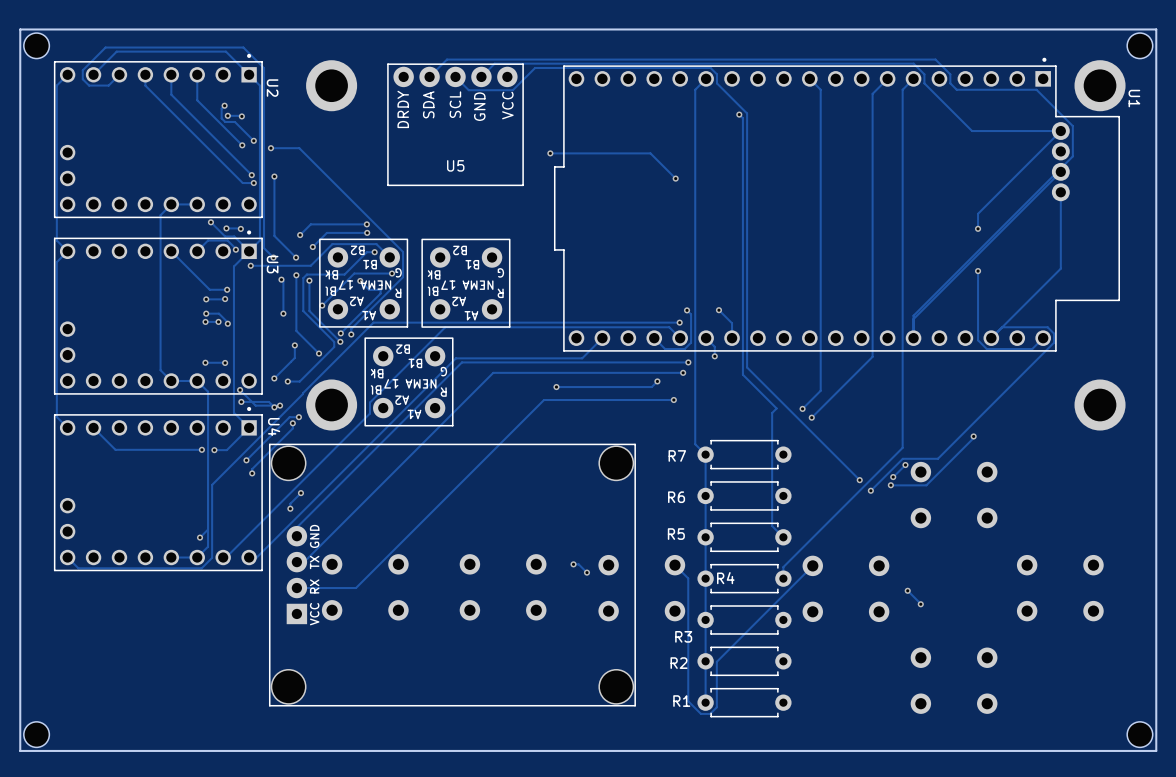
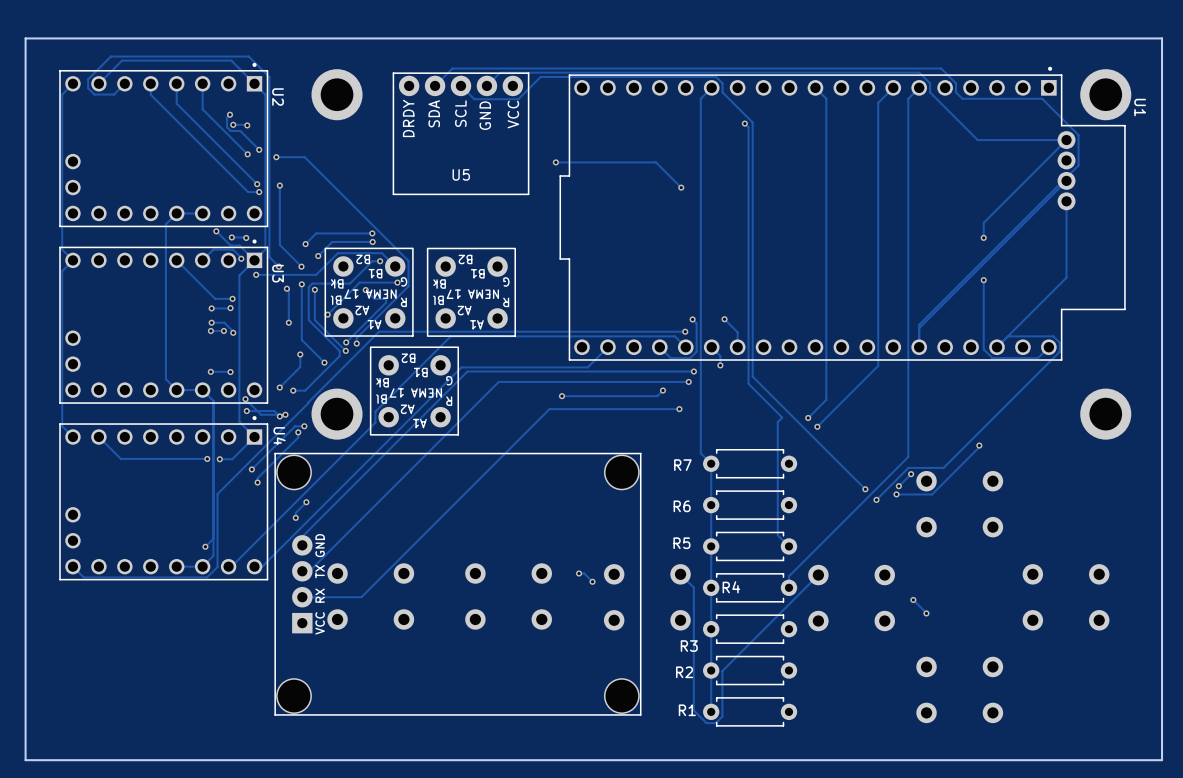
part: (36, 45) -> none
part: (1139, 45) -> none
part: (36, 734) -> none
part: (1139, 734) -> none

